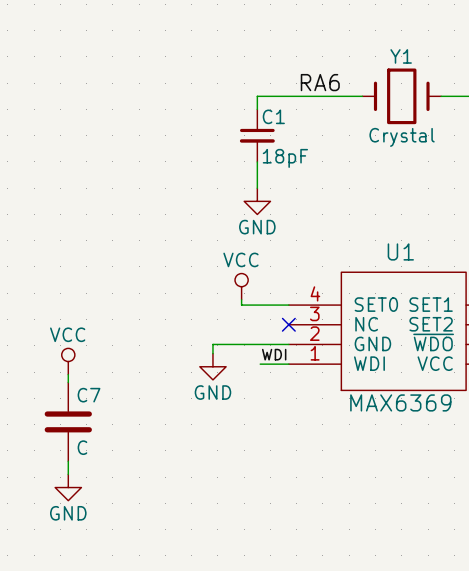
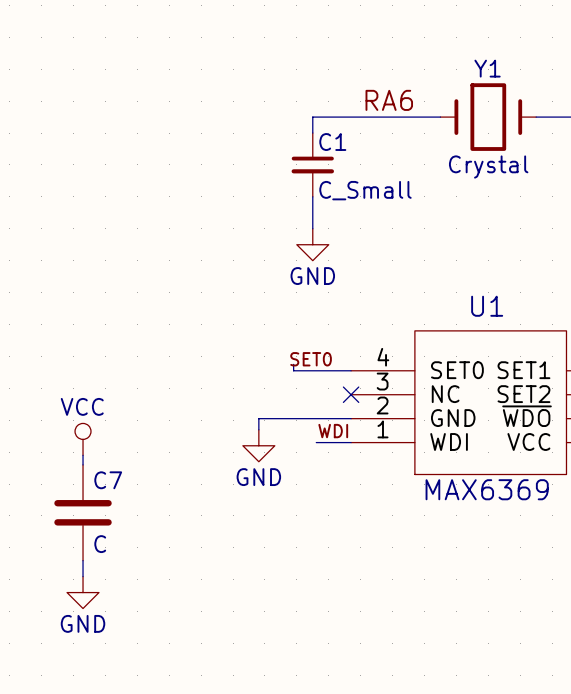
C1 value: 18pF (285, 158) -> C_Small (365, 190)
power symbol: VCC (241, 286) -> none
label: none -> SET0 (311, 359)

